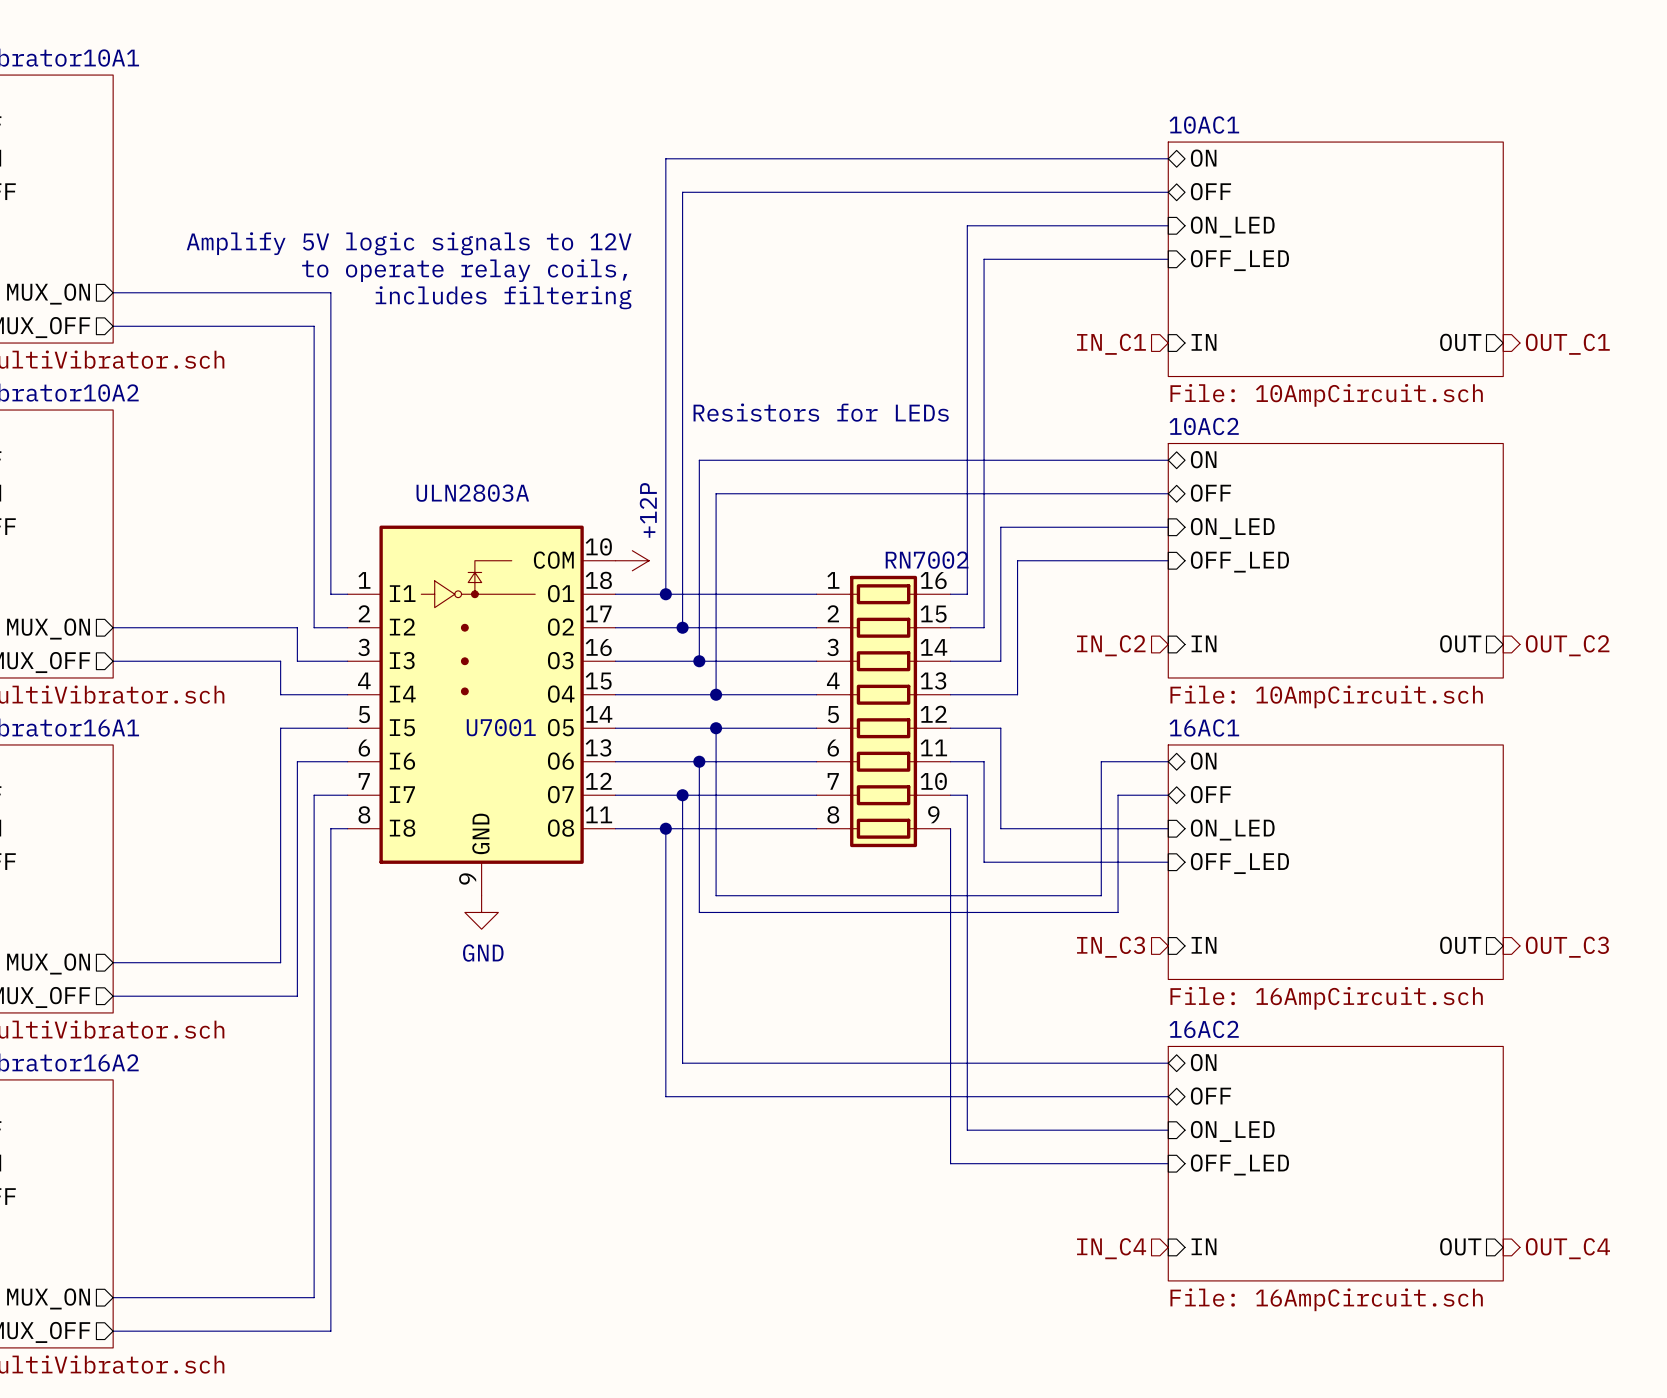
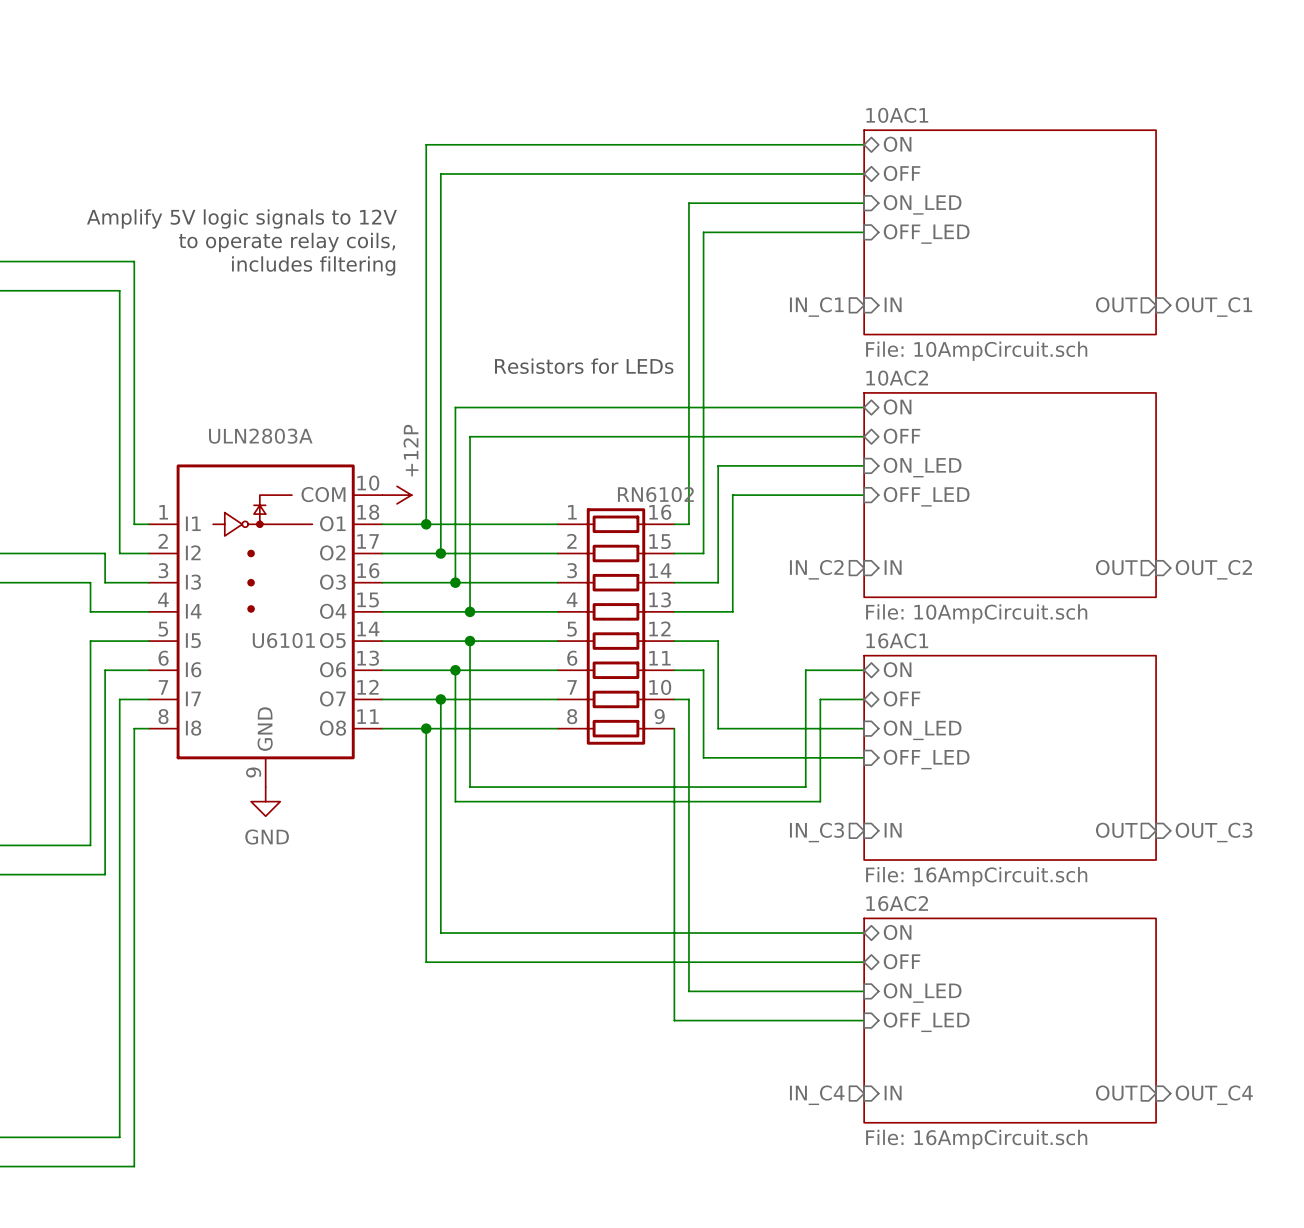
RN7002 name: RN7002 (927, 560) -> RN6102 (655, 494)
U7001 name: U7001 (501, 727) -> U6101 (283, 640)

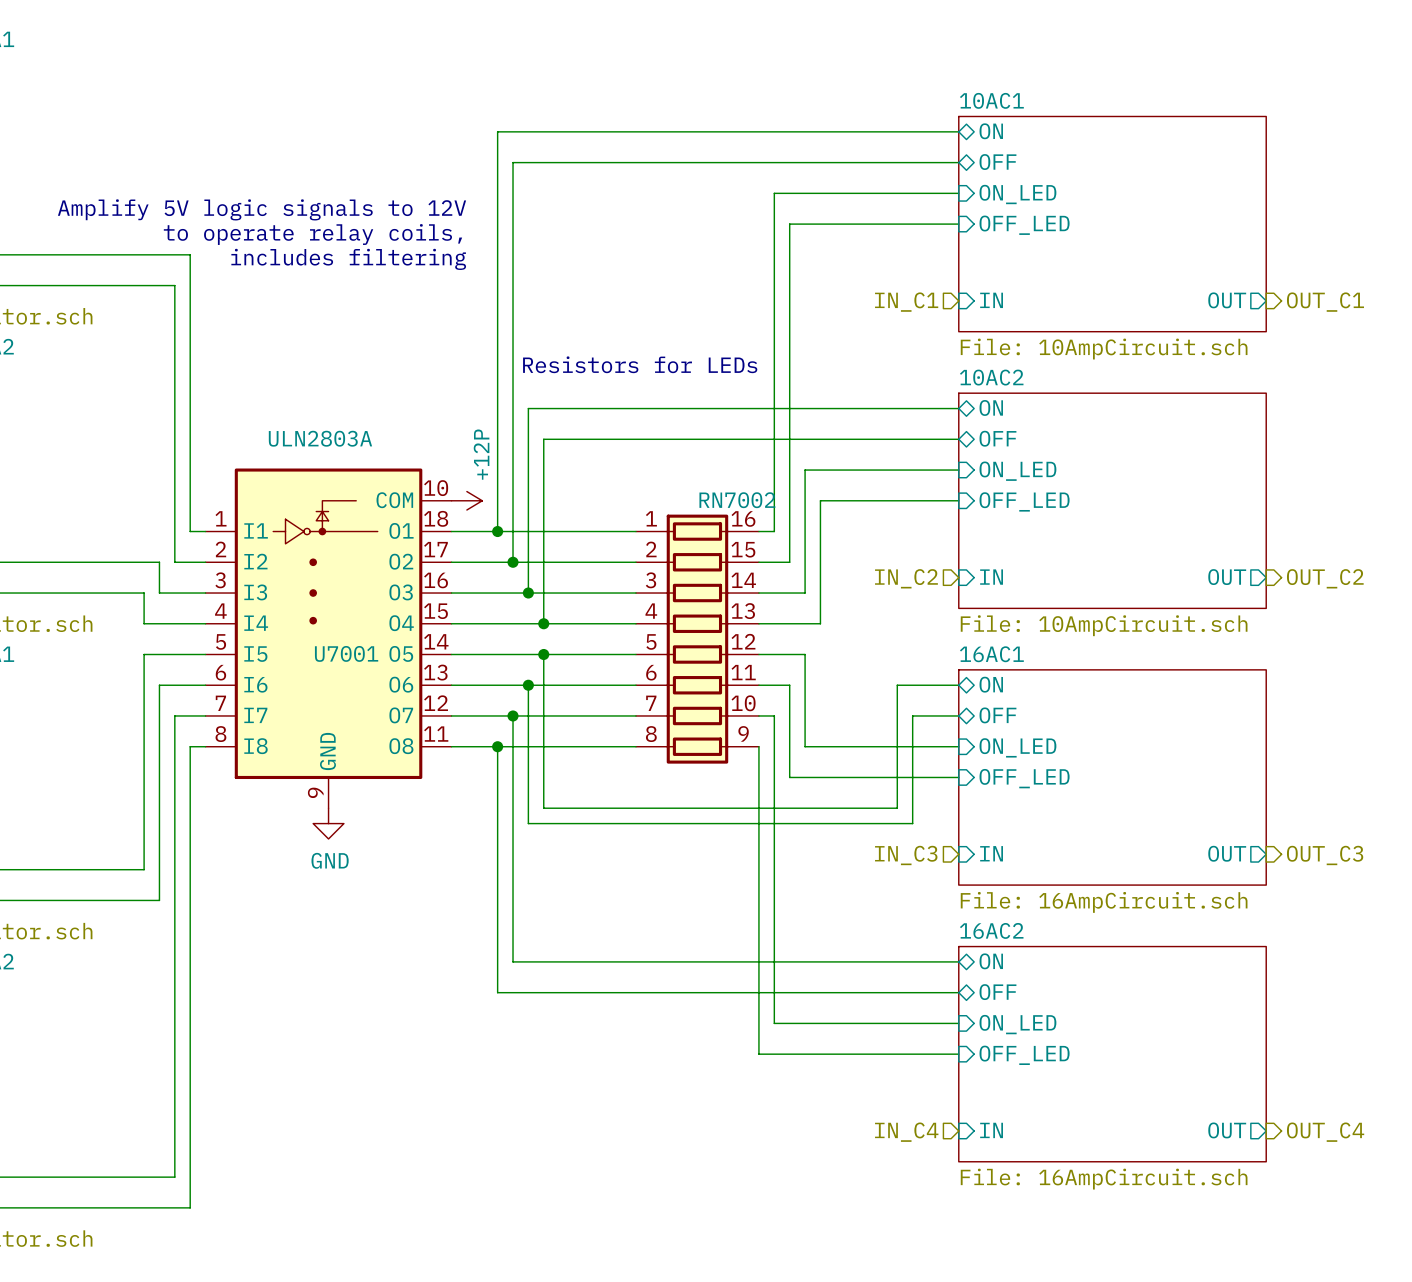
RN6102 name: RN6102 (655, 494) -> RN7002 (737, 500)
U6101 name: U6101 (283, 640) -> U7001 (346, 653)

